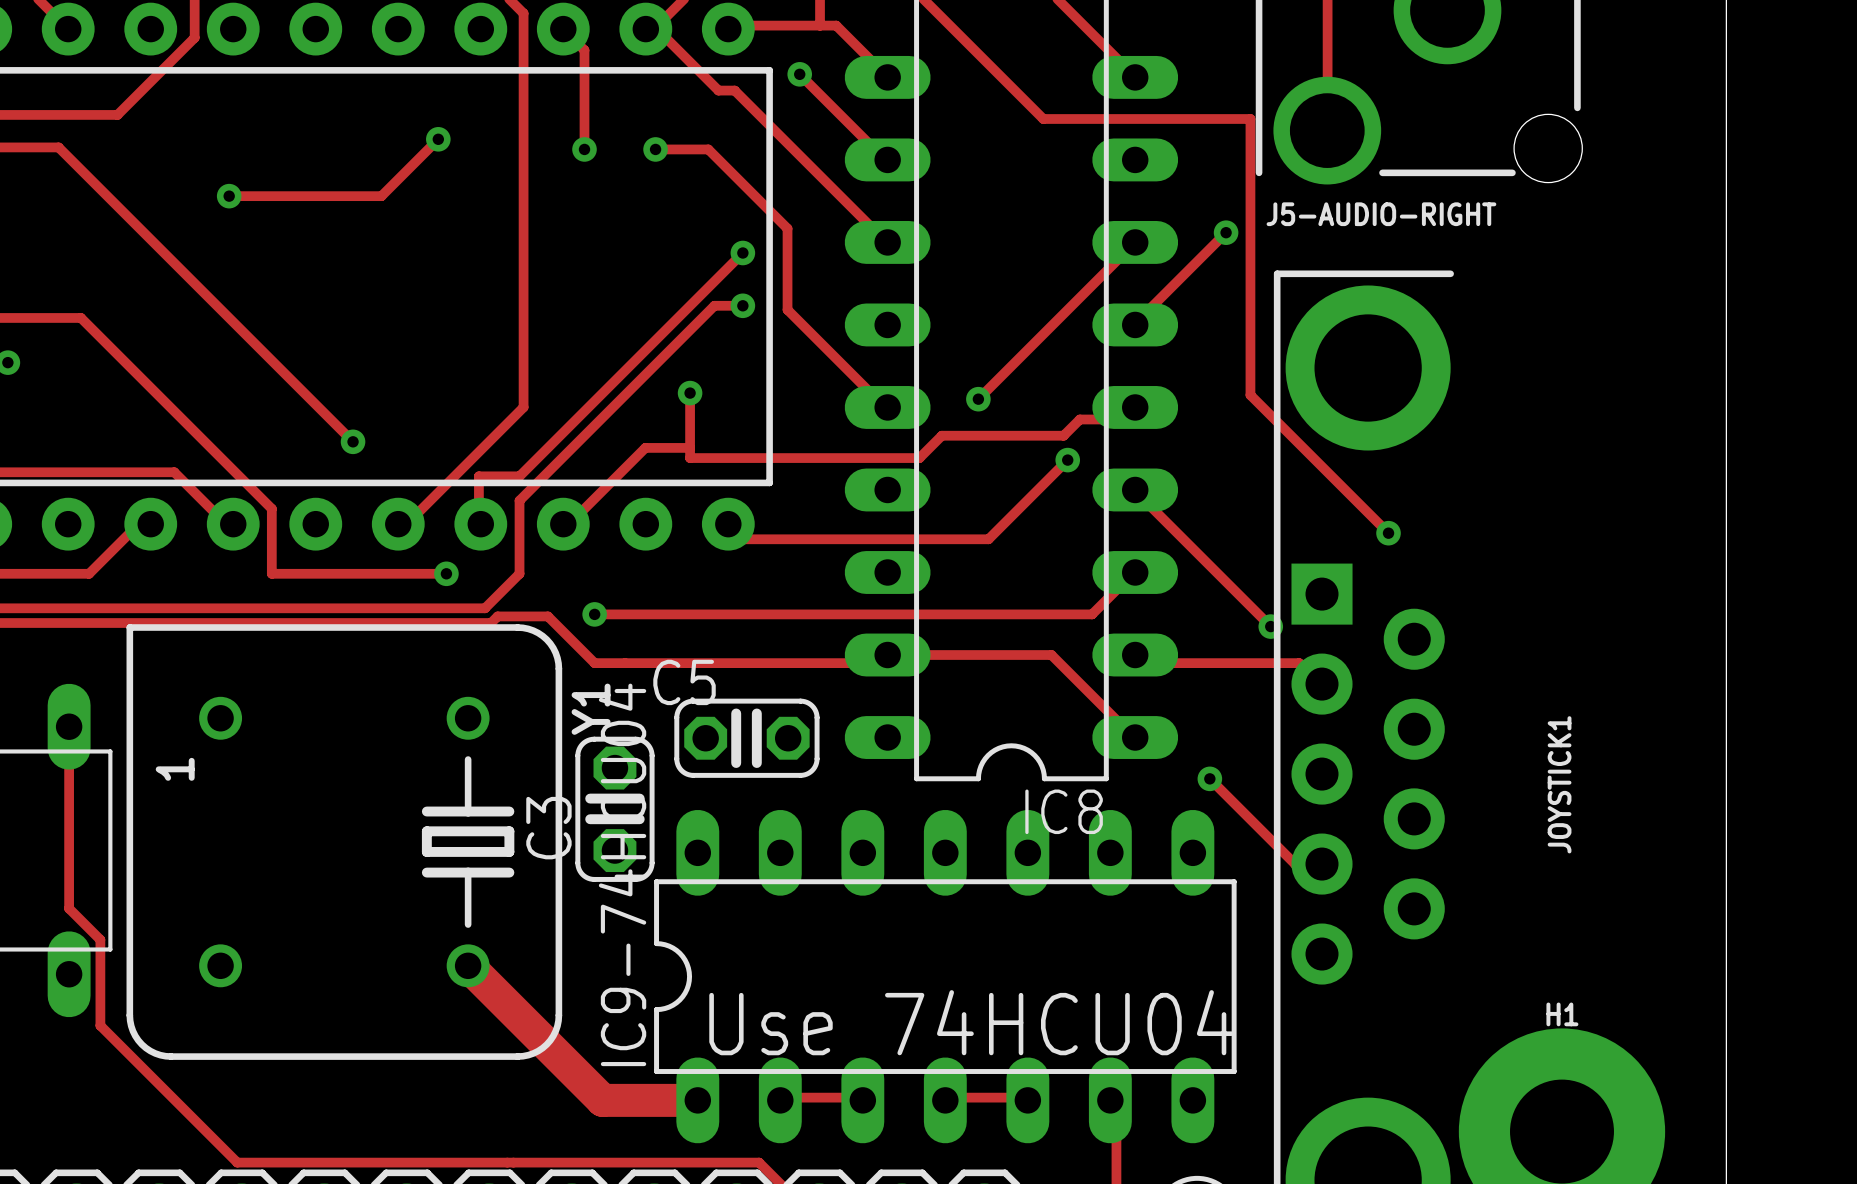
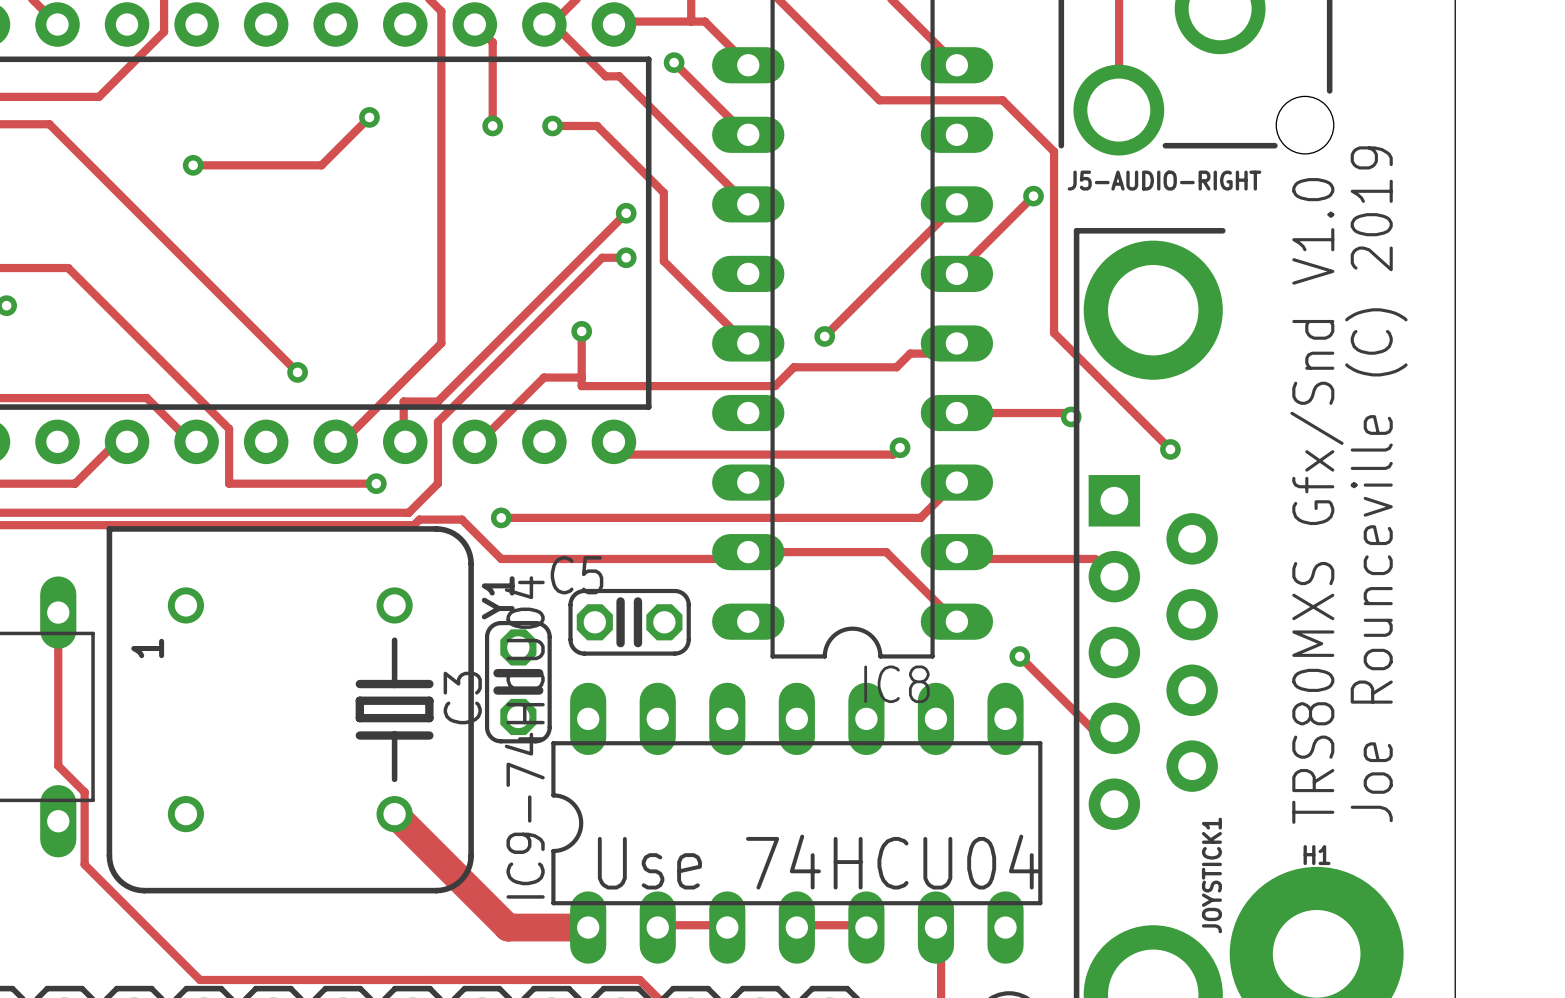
track: (1189, 118) (1250, 118) (1250, 179) -> (1002, 100) (1054, 151)
track: (1067, 460) (988, 539) -> (900, 447) (893, 454) (833, 454)
via position: (1067, 460) -> (900, 447)
track: (1135, 489) (1270, 626) -> (956, 413) (1067, 413) (1071, 416)
via: none -> (1071, 416)
text: none -> Joe Rounceville (C) 2019 (1376, 484)
text: none -> TRS80MXS Gfx/Snd V1.0 (1317, 500)
via: (1270, 626) -> none
JOYSTICK1 name position: JOYSTICK1 (1559, 784) -> JOYSTICK1 (1211, 875)

